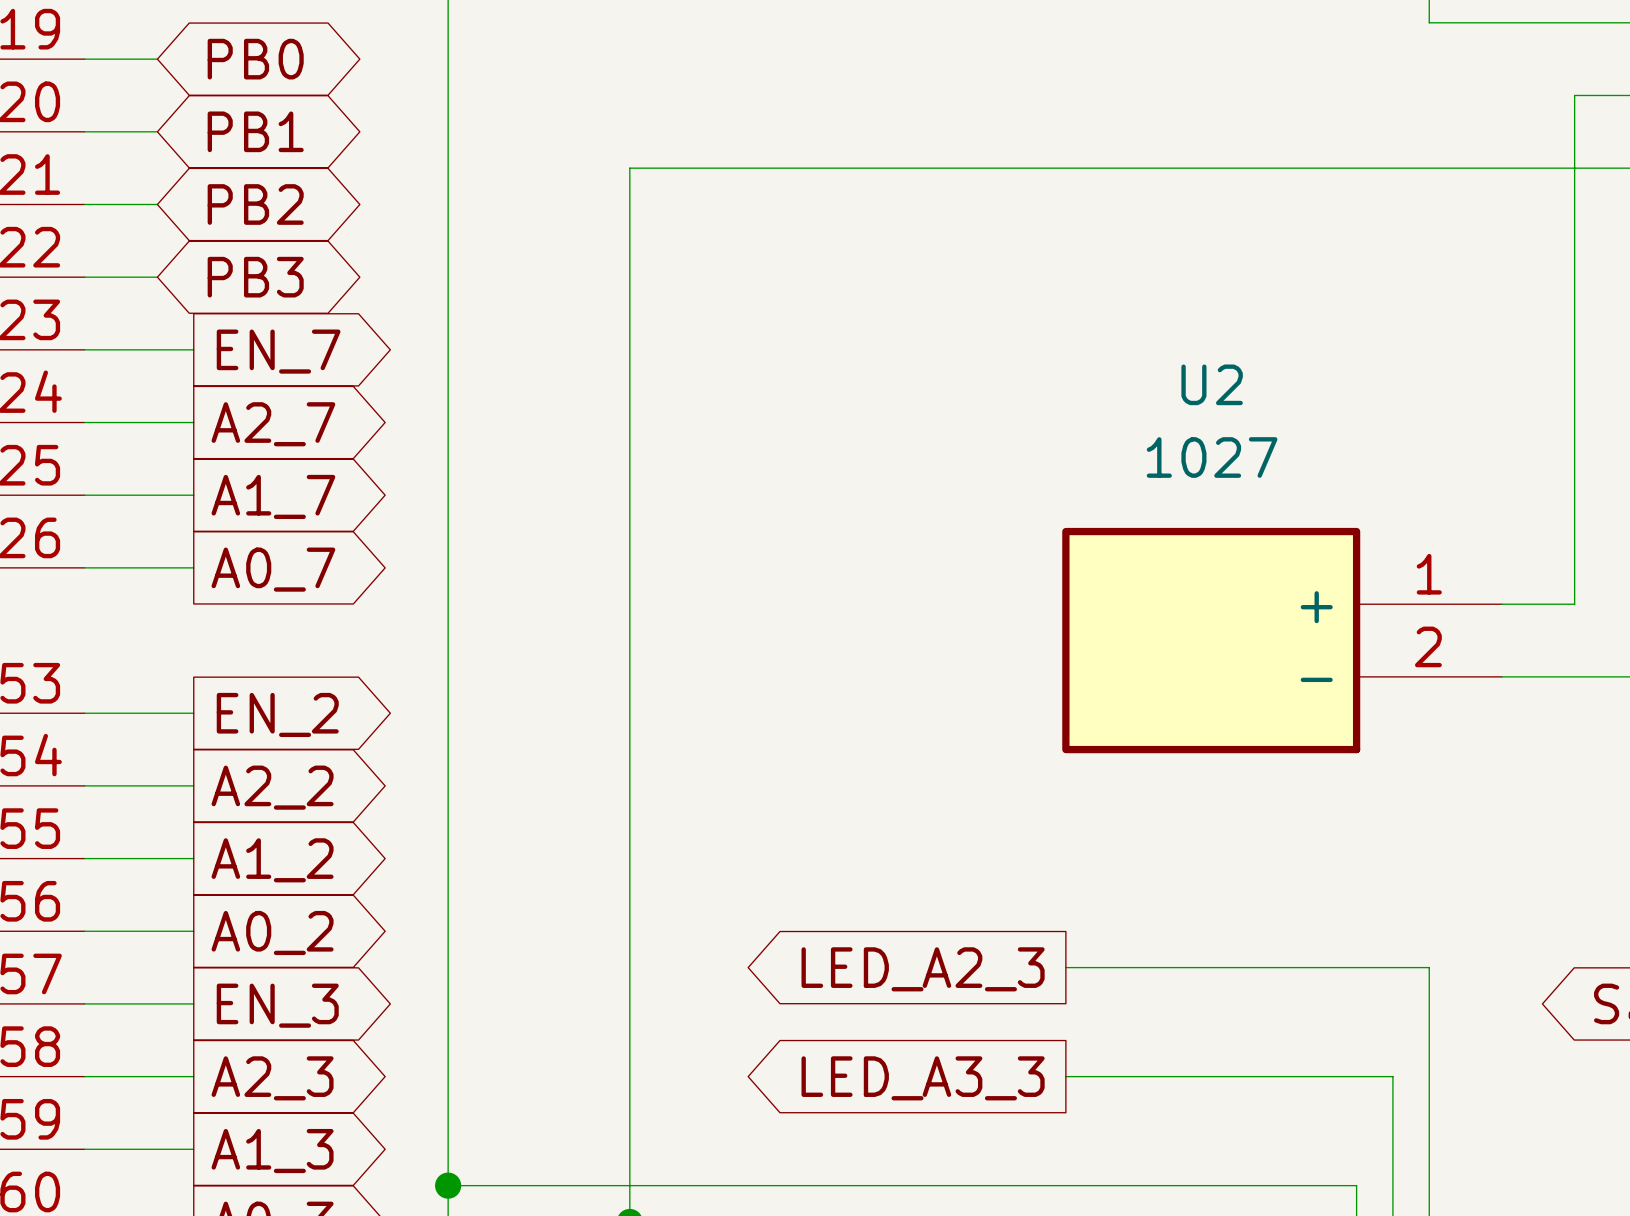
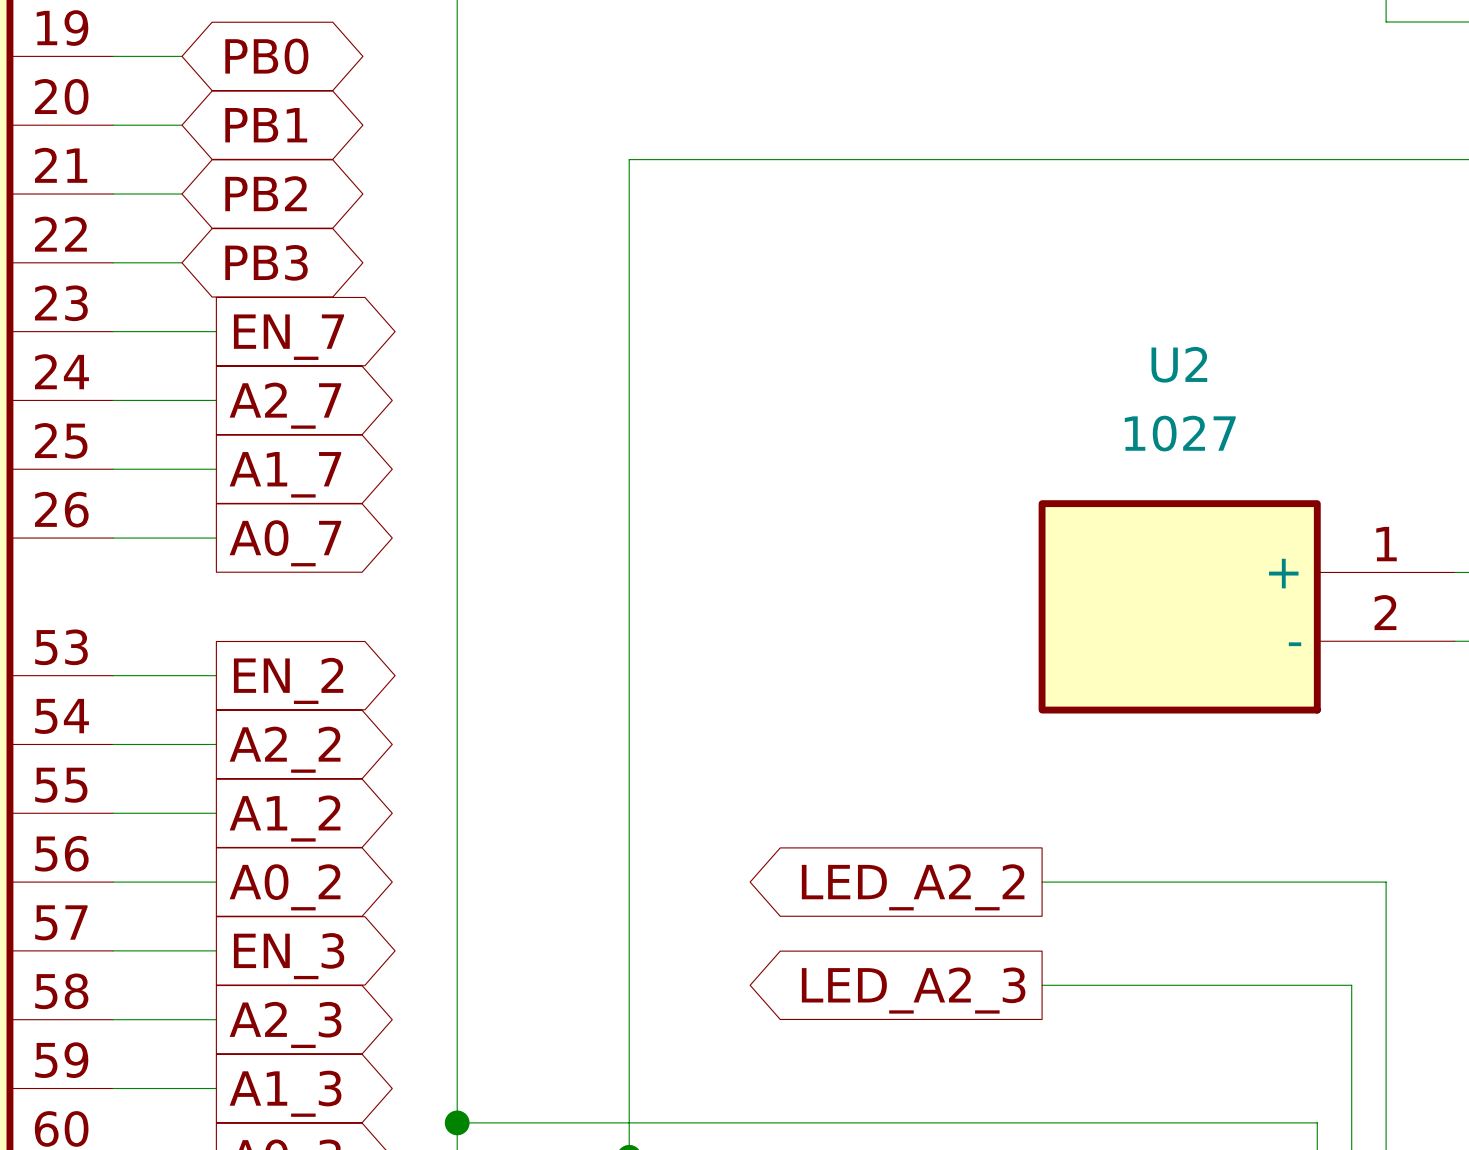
global label: none -> LED_A2_2 (913, 887)
wire: (1065, 967) (1429, 967) -> (1042, 882) (1386, 882) (1386, 916)
global label position: LED_A2_3 (923, 969) -> LED_A2_3 (913, 990)
wire: (1065, 1076) (1392, 1076) -> (1042, 985) (1351, 985) (1351, 1019)
global label: LED_A3_3 (923, 1078) -> none

